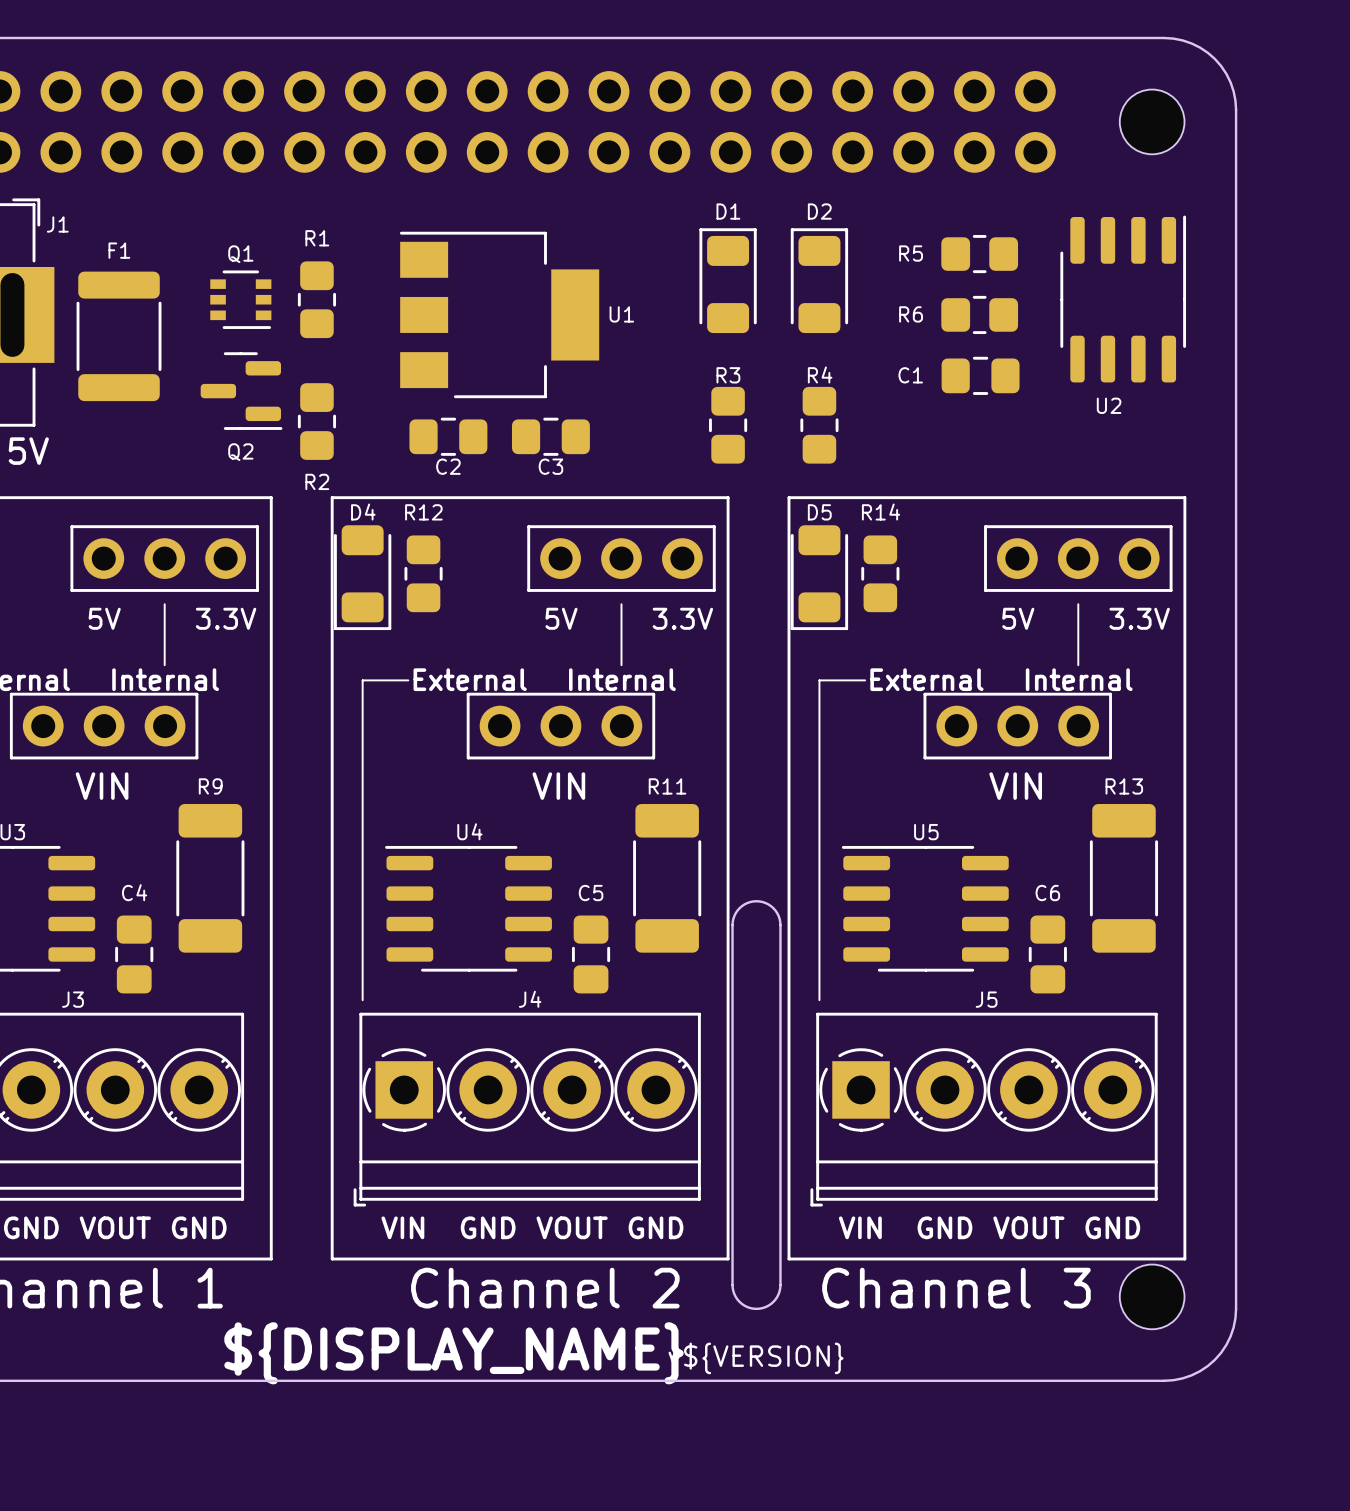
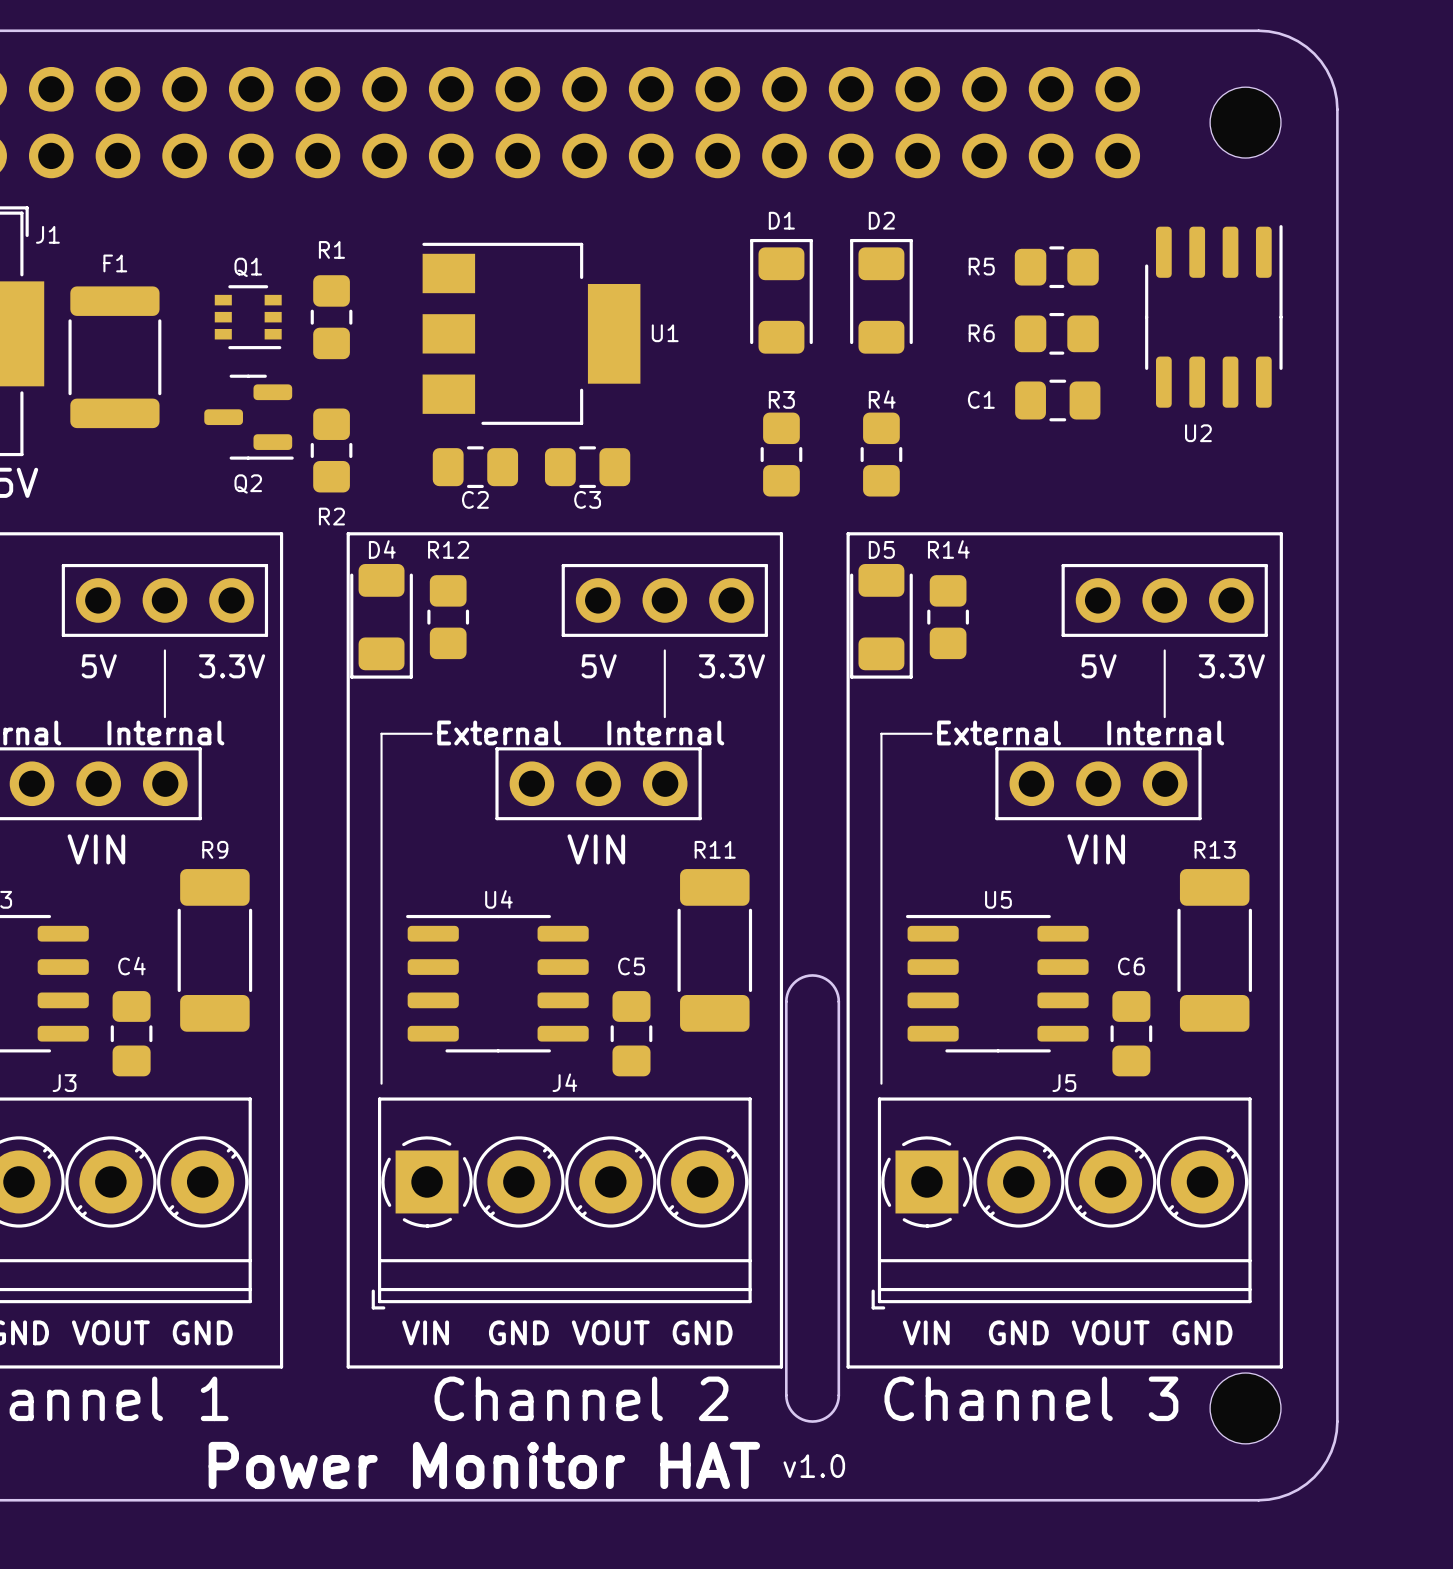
text: ${DISPLAY_NAME} (454, 1353) -> Power Monitor HAT (484, 1465)
text: v${VERSION} (756, 1358) -> v1.0 (814, 1466)

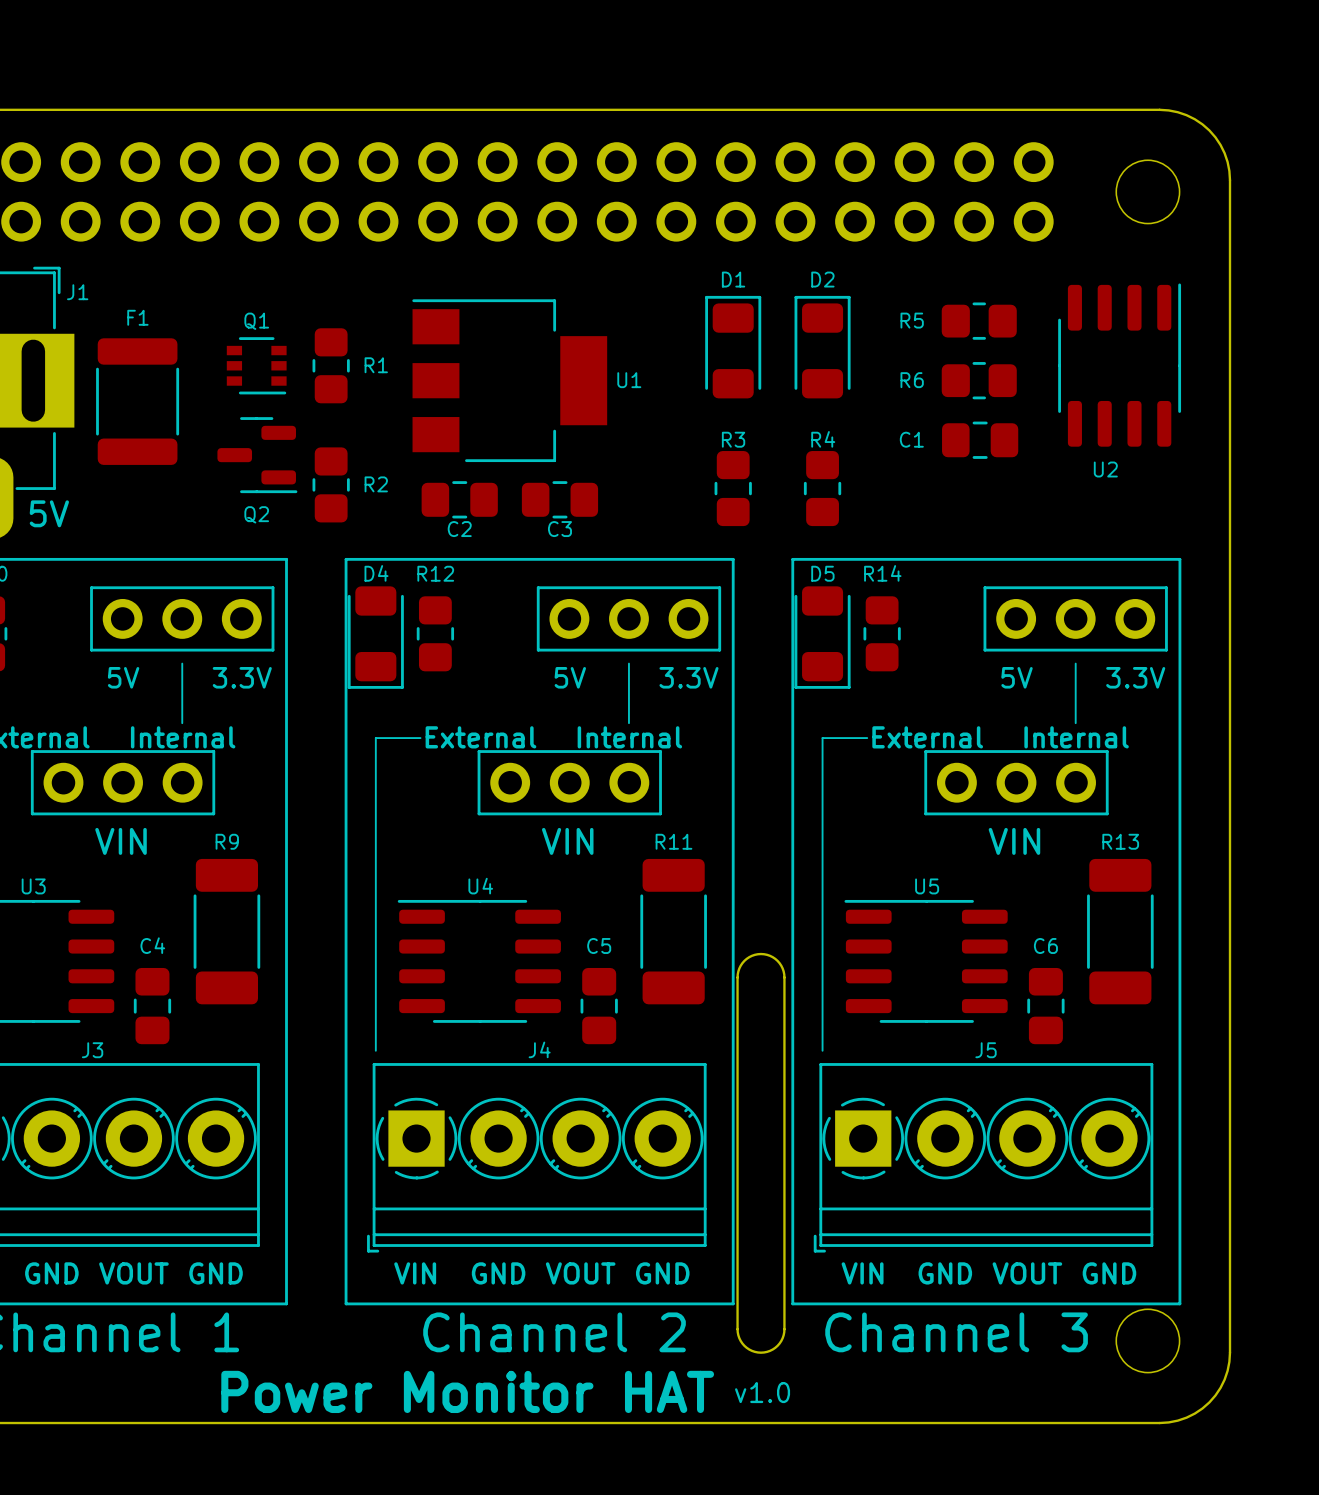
R1 name position: R1 (331, 249) -> R1 (376, 365)
R2 name position: R2 (331, 516) -> R2 (376, 484)

